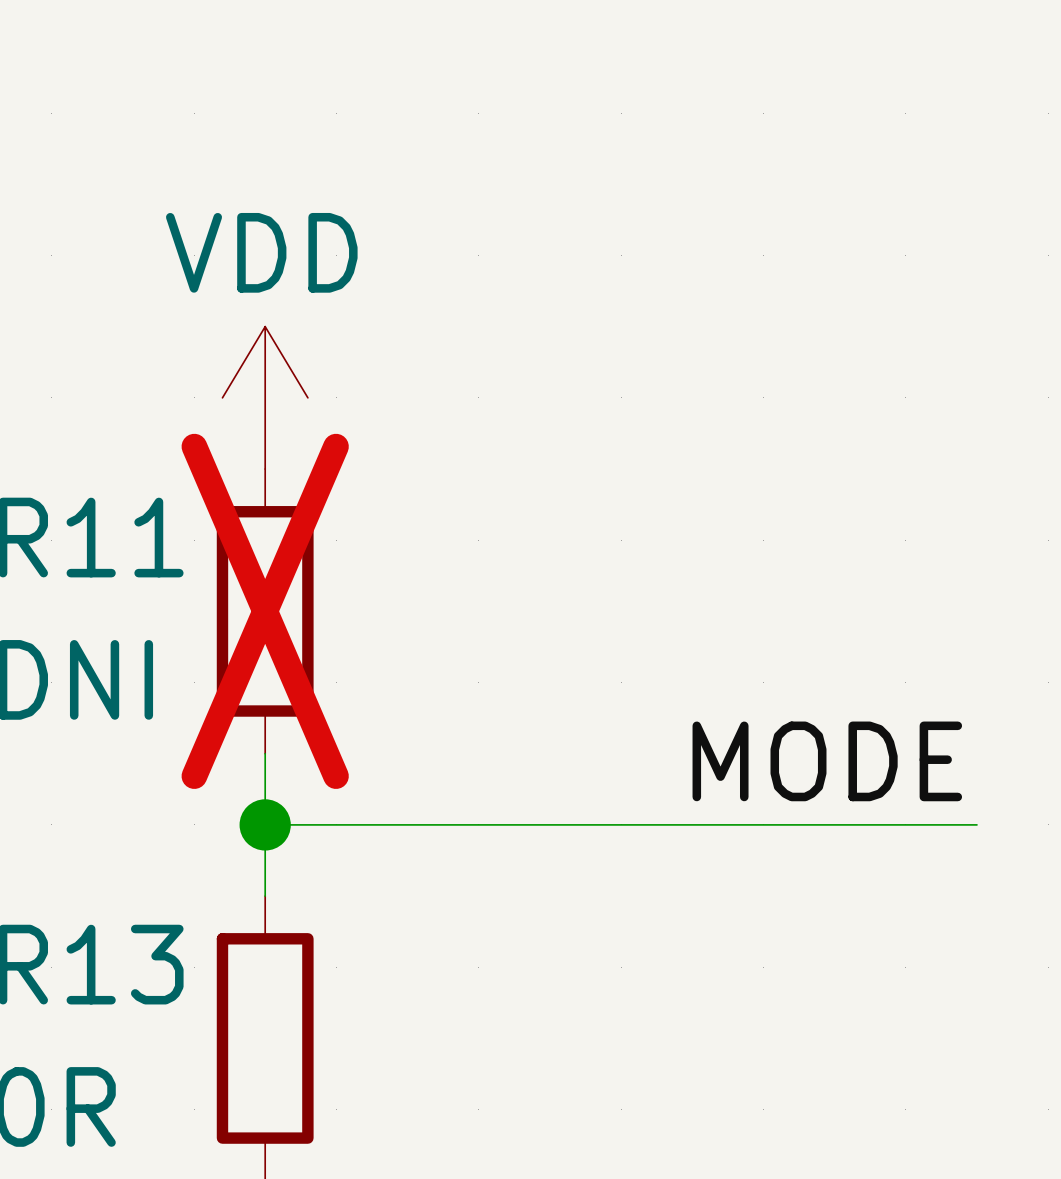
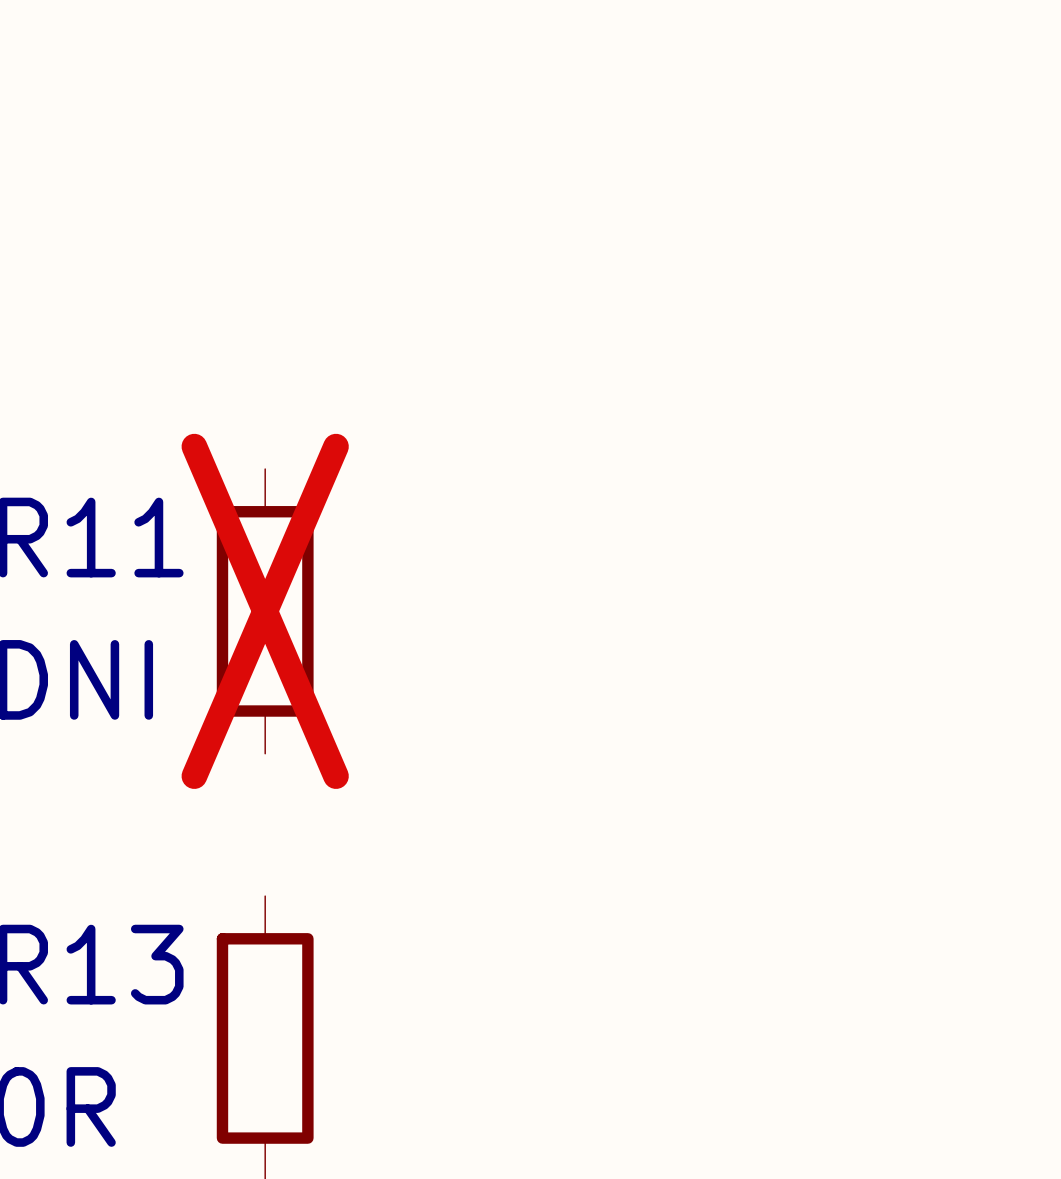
power symbol: VDD (265, 397) -> none
wire: (265, 753) (265, 896) -> none
label: MODE (827, 761) -> none
wire: (265, 824) (976, 824) -> none
junction: (265, 824) -> none

